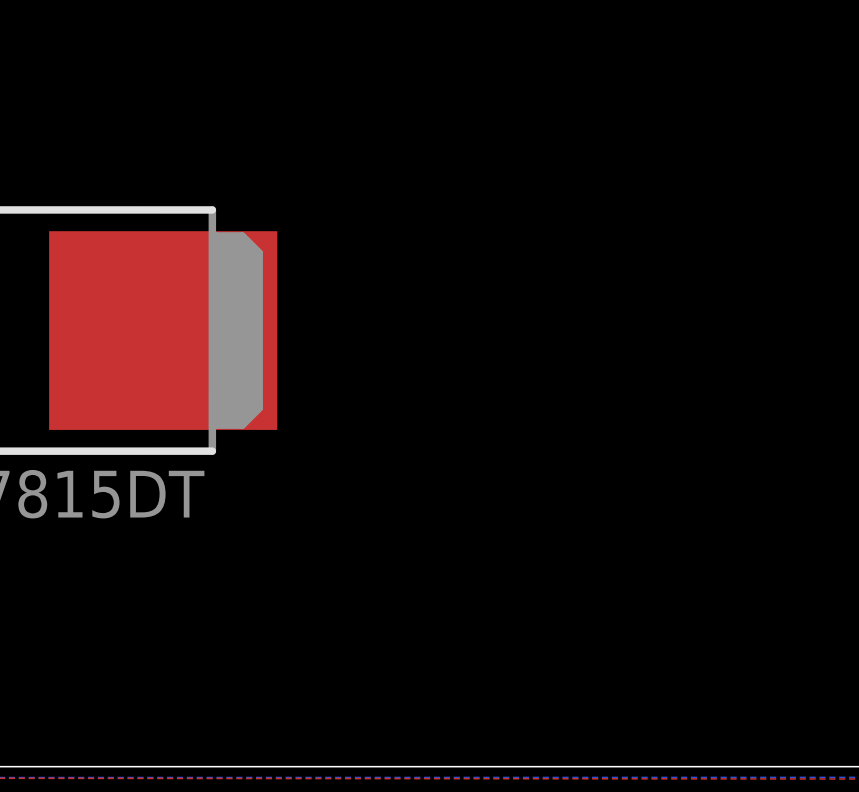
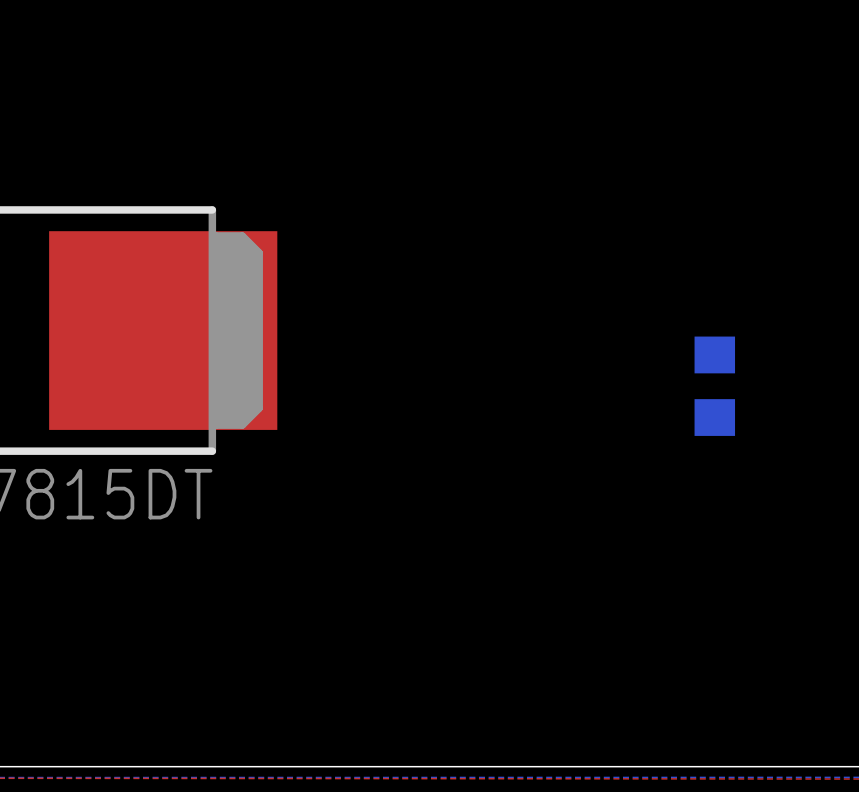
part: none -> (714, 386)

